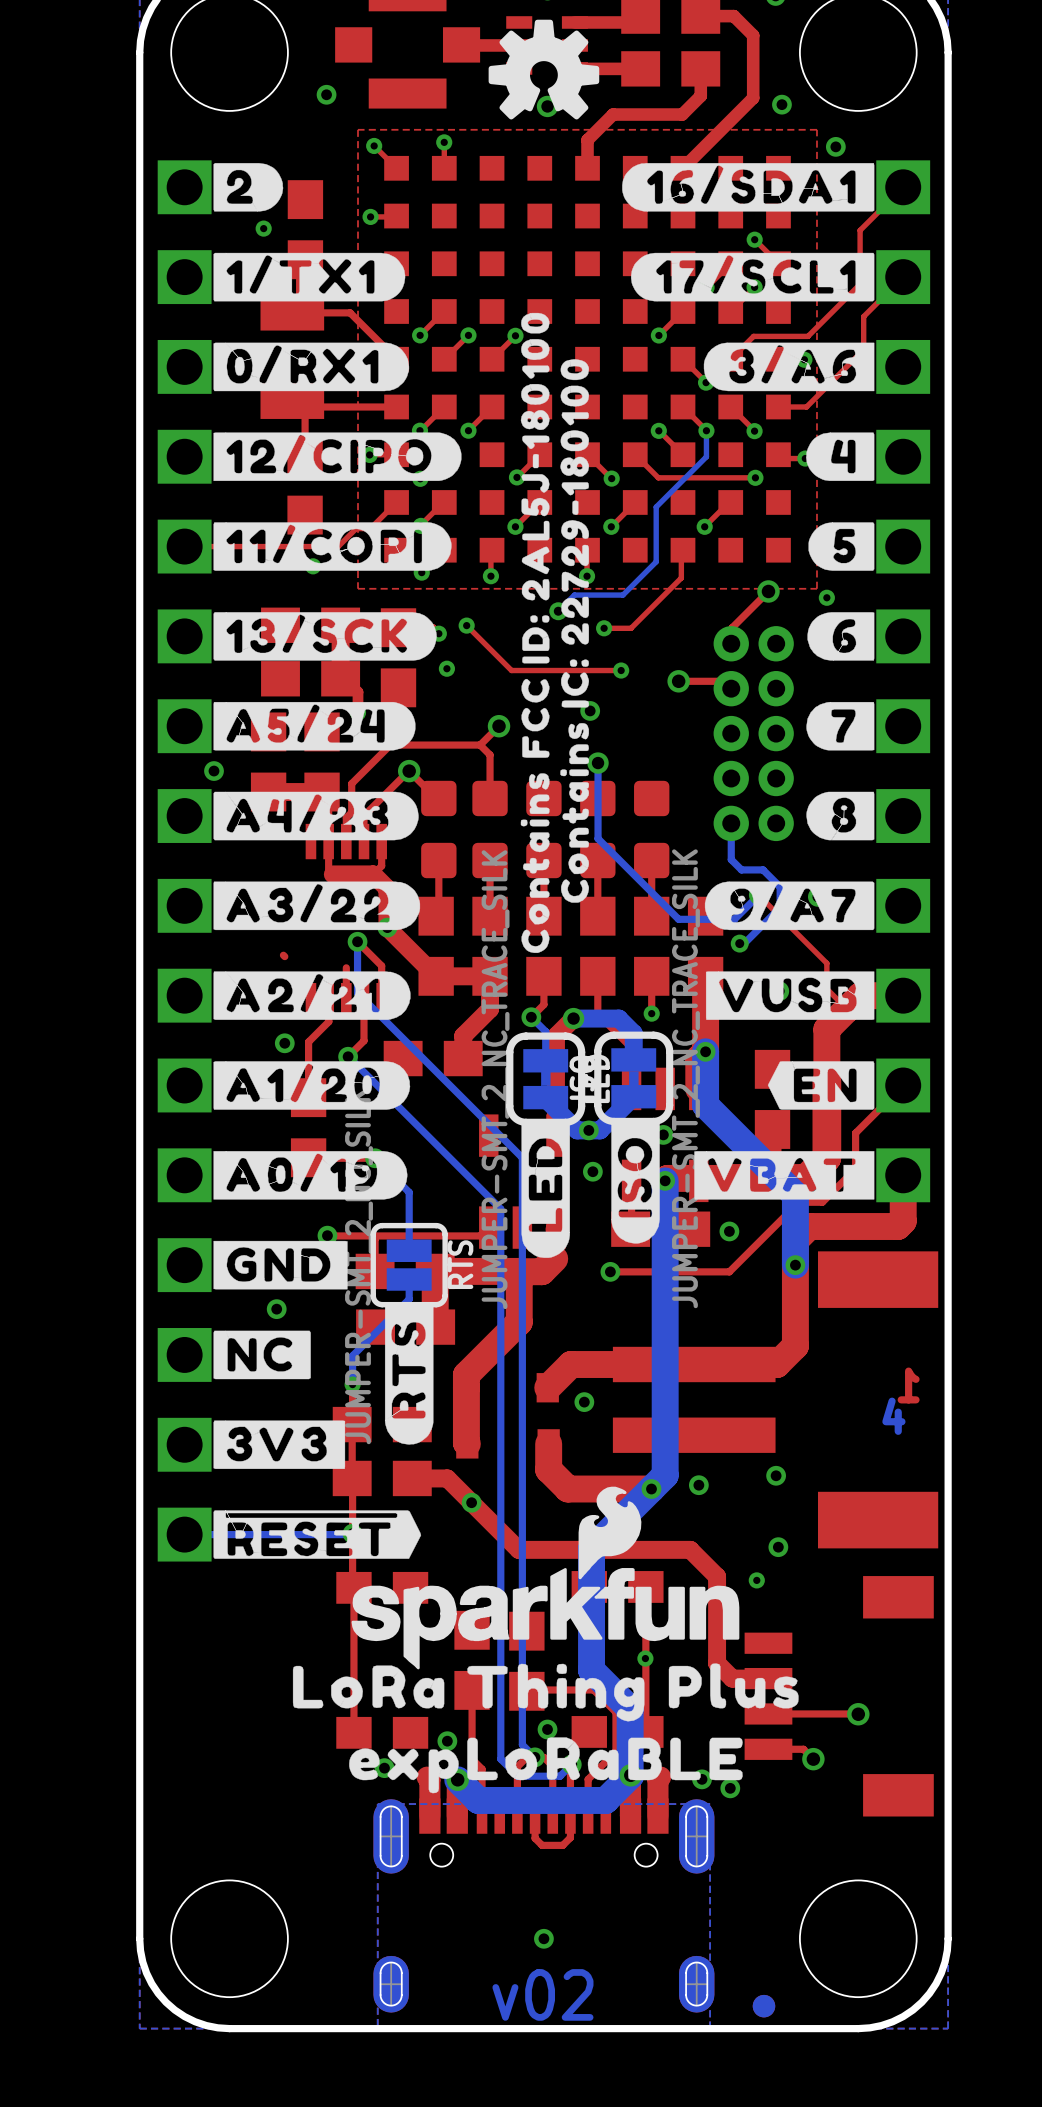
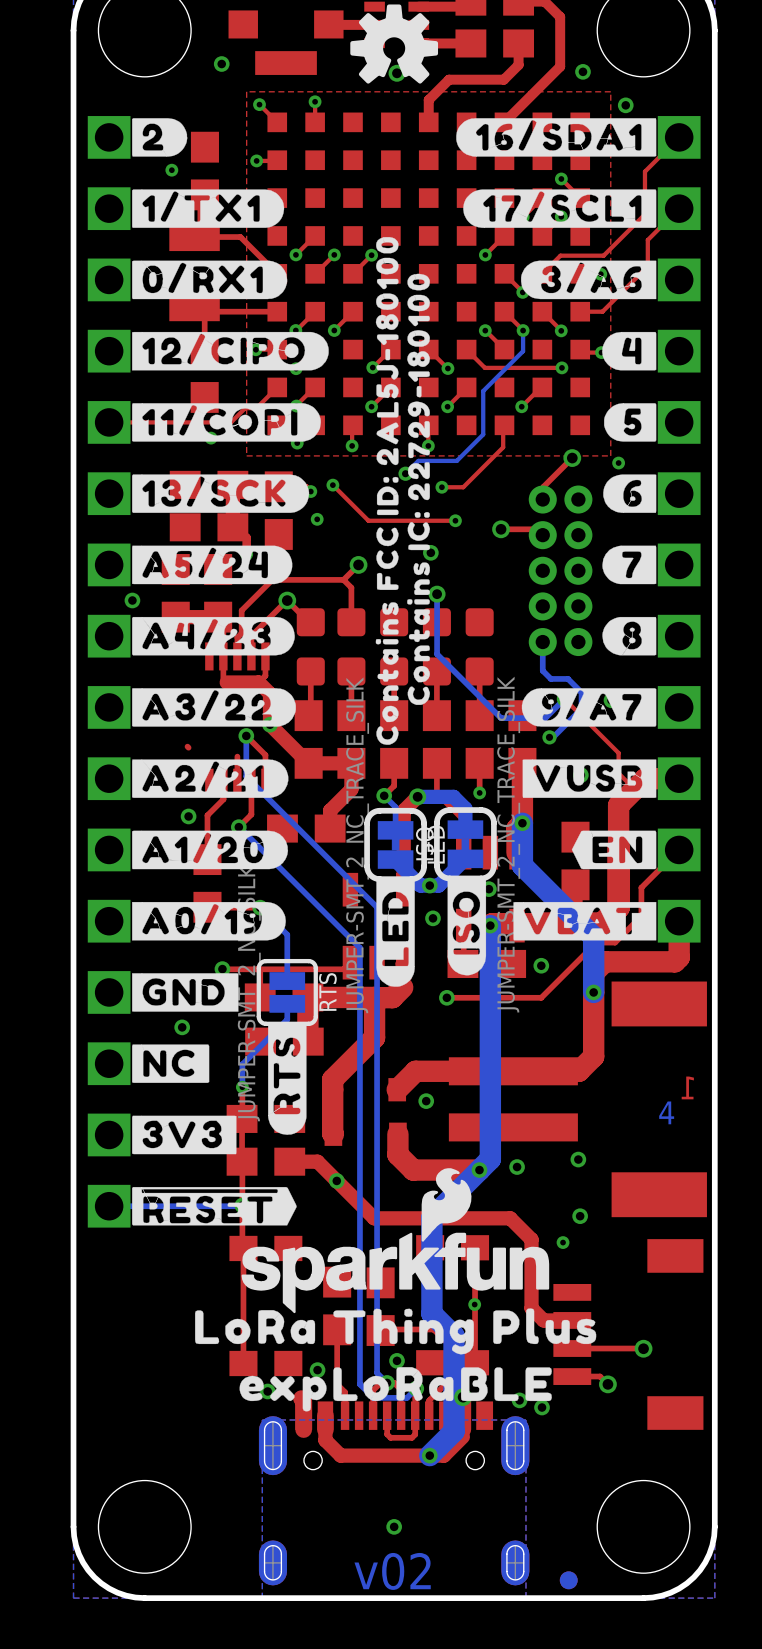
bottom track: (619, 1698) (630, 1708) (630, 1775) (605, 1800) (478, 1800) (457, 1779) -> (454, 1335) (454, 1431) (429, 1455)
top track: (660, 1777) (657, 1779) (657, 1816) -> none
via: (457, 1779) -> none
part footprint: [373, 1798, 715, 2013] -> [258, 1401, 530, 1586]
top track: none -> (325, 1429) (325, 1440) (340, 1455) (444, 1455) (462, 1436)
top track: (535, 1822) (535, 1838) (542, 1845) (562, 1845) (570, 1837) (570, 1822) -> (387, 1434) (390, 1437) (411, 1437) (415, 1434)
via: none -> (429, 1455)

